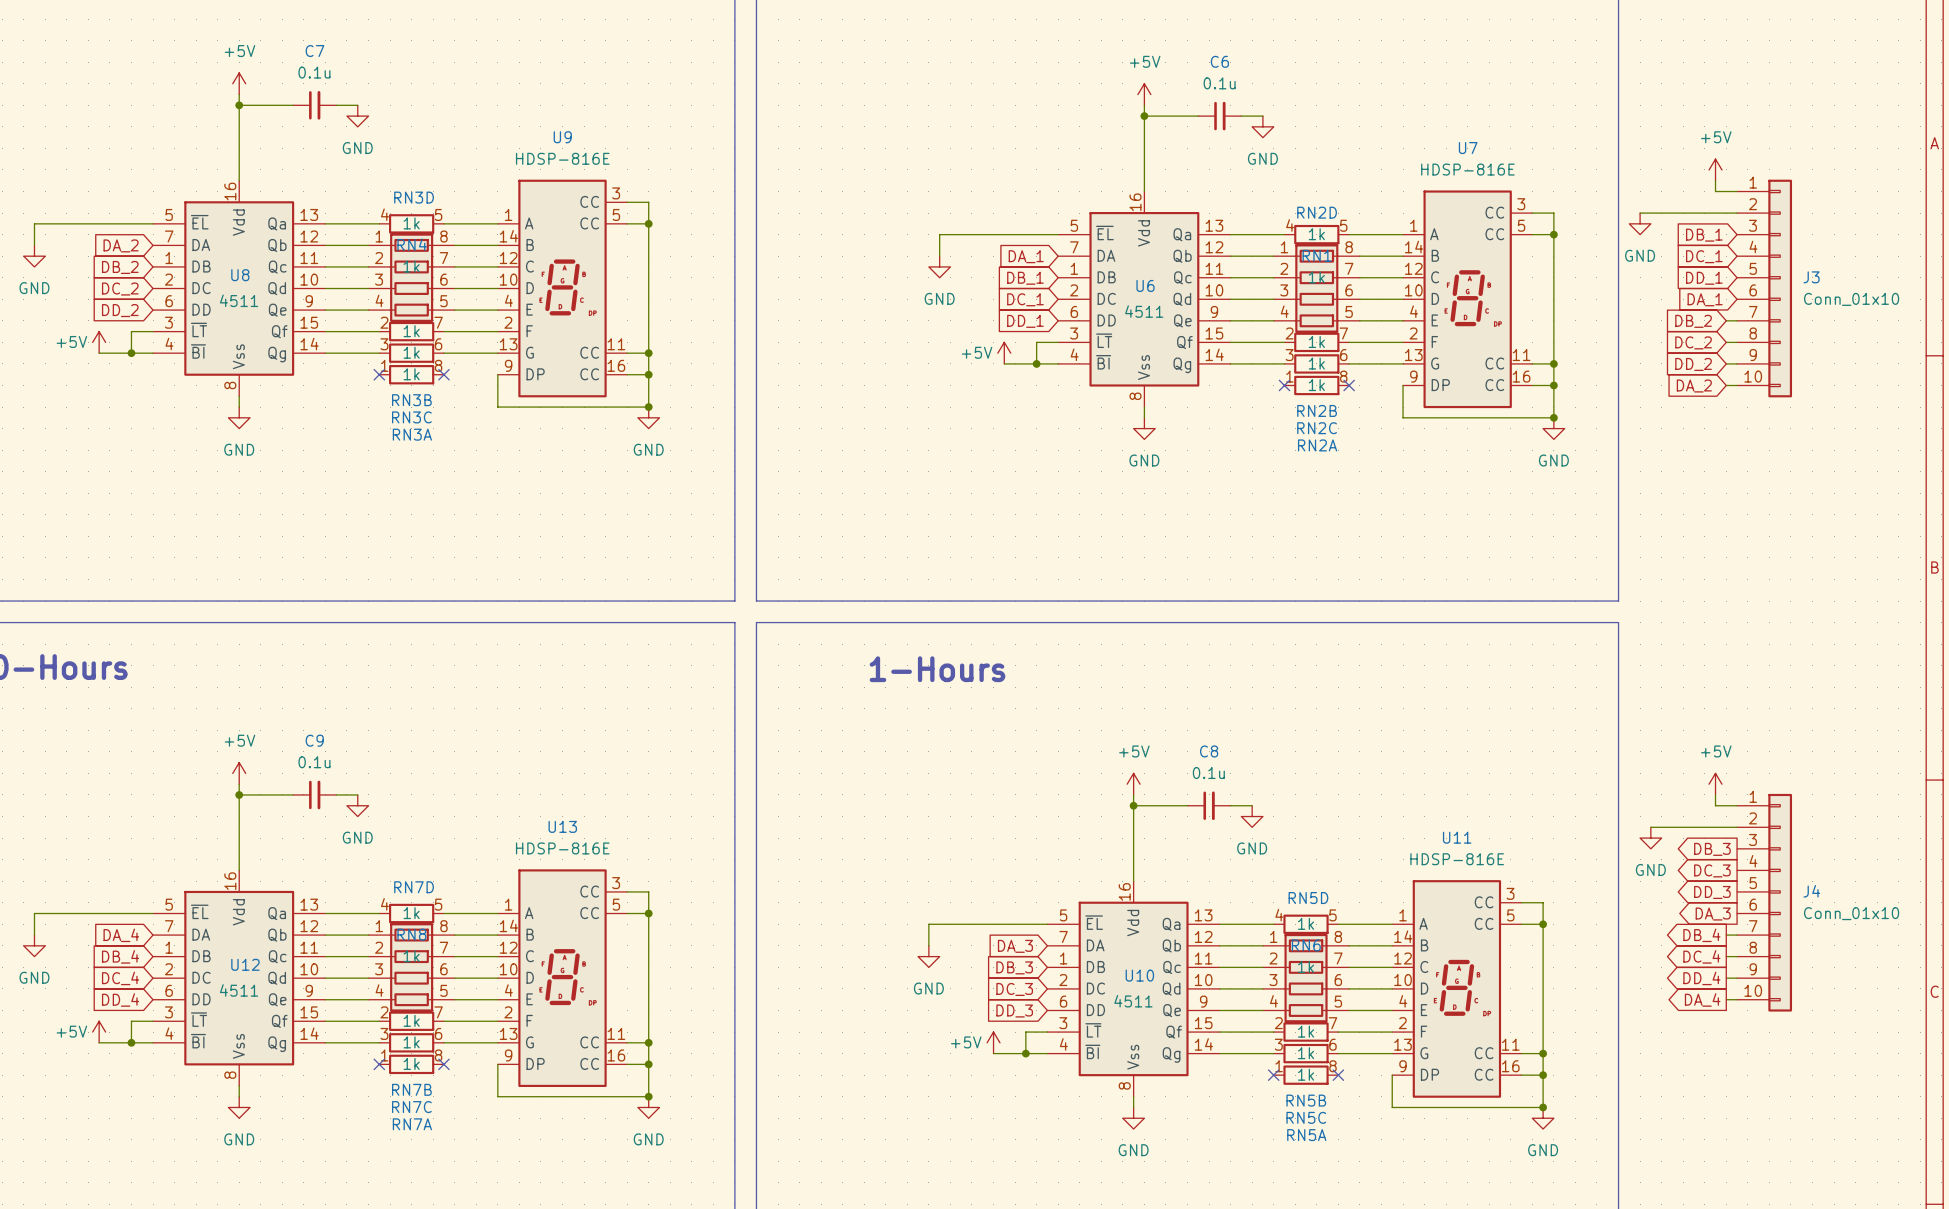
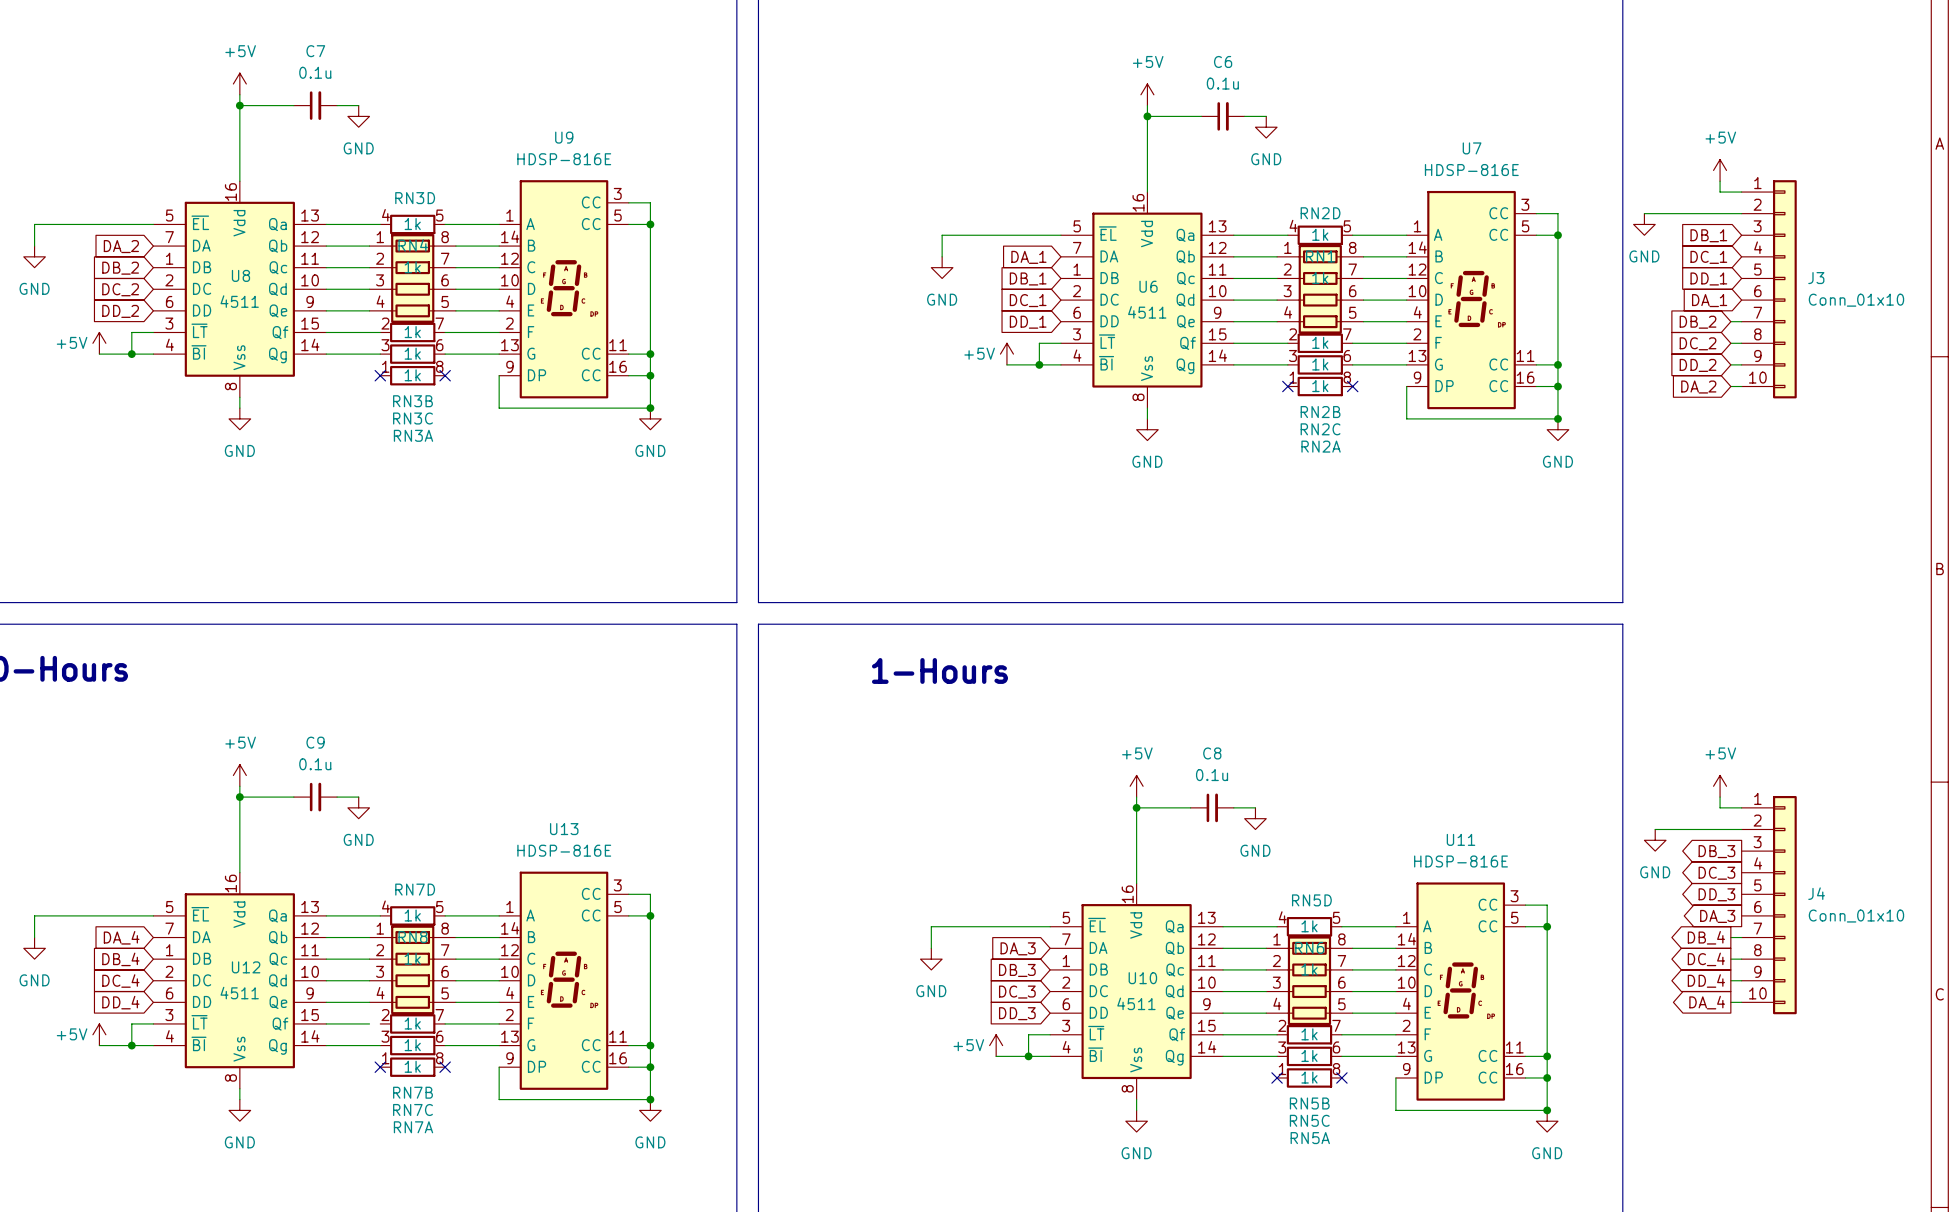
wire: (368, 1021) (379, 1021) -> none

